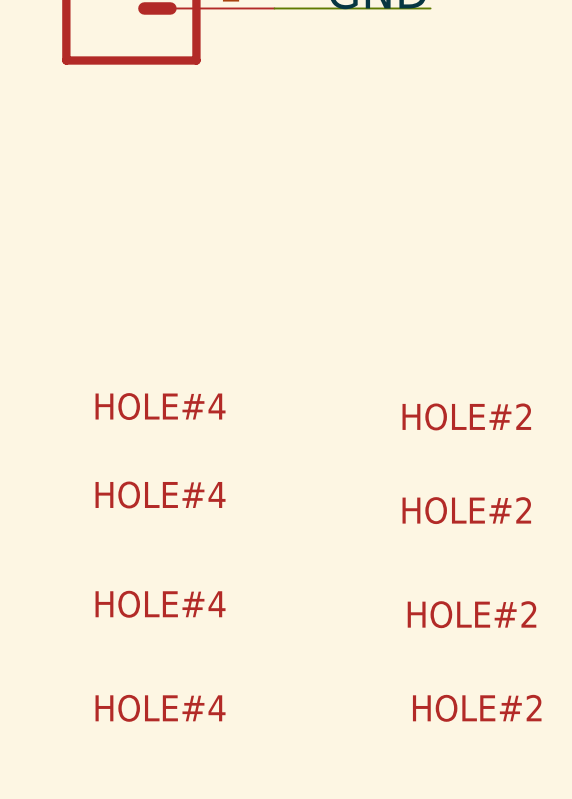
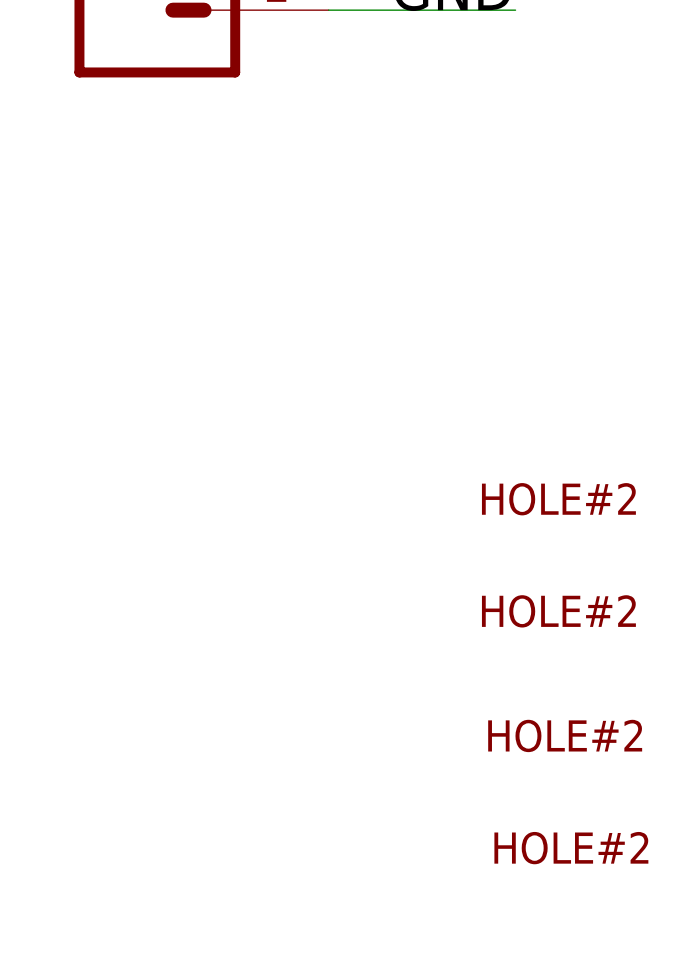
part: HOLE#4 (160, 406) -> none
part: HOLE#4 (160, 495) -> none
part: HOLE#4 (160, 604) -> none
part: HOLE#4 (160, 708) -> none

